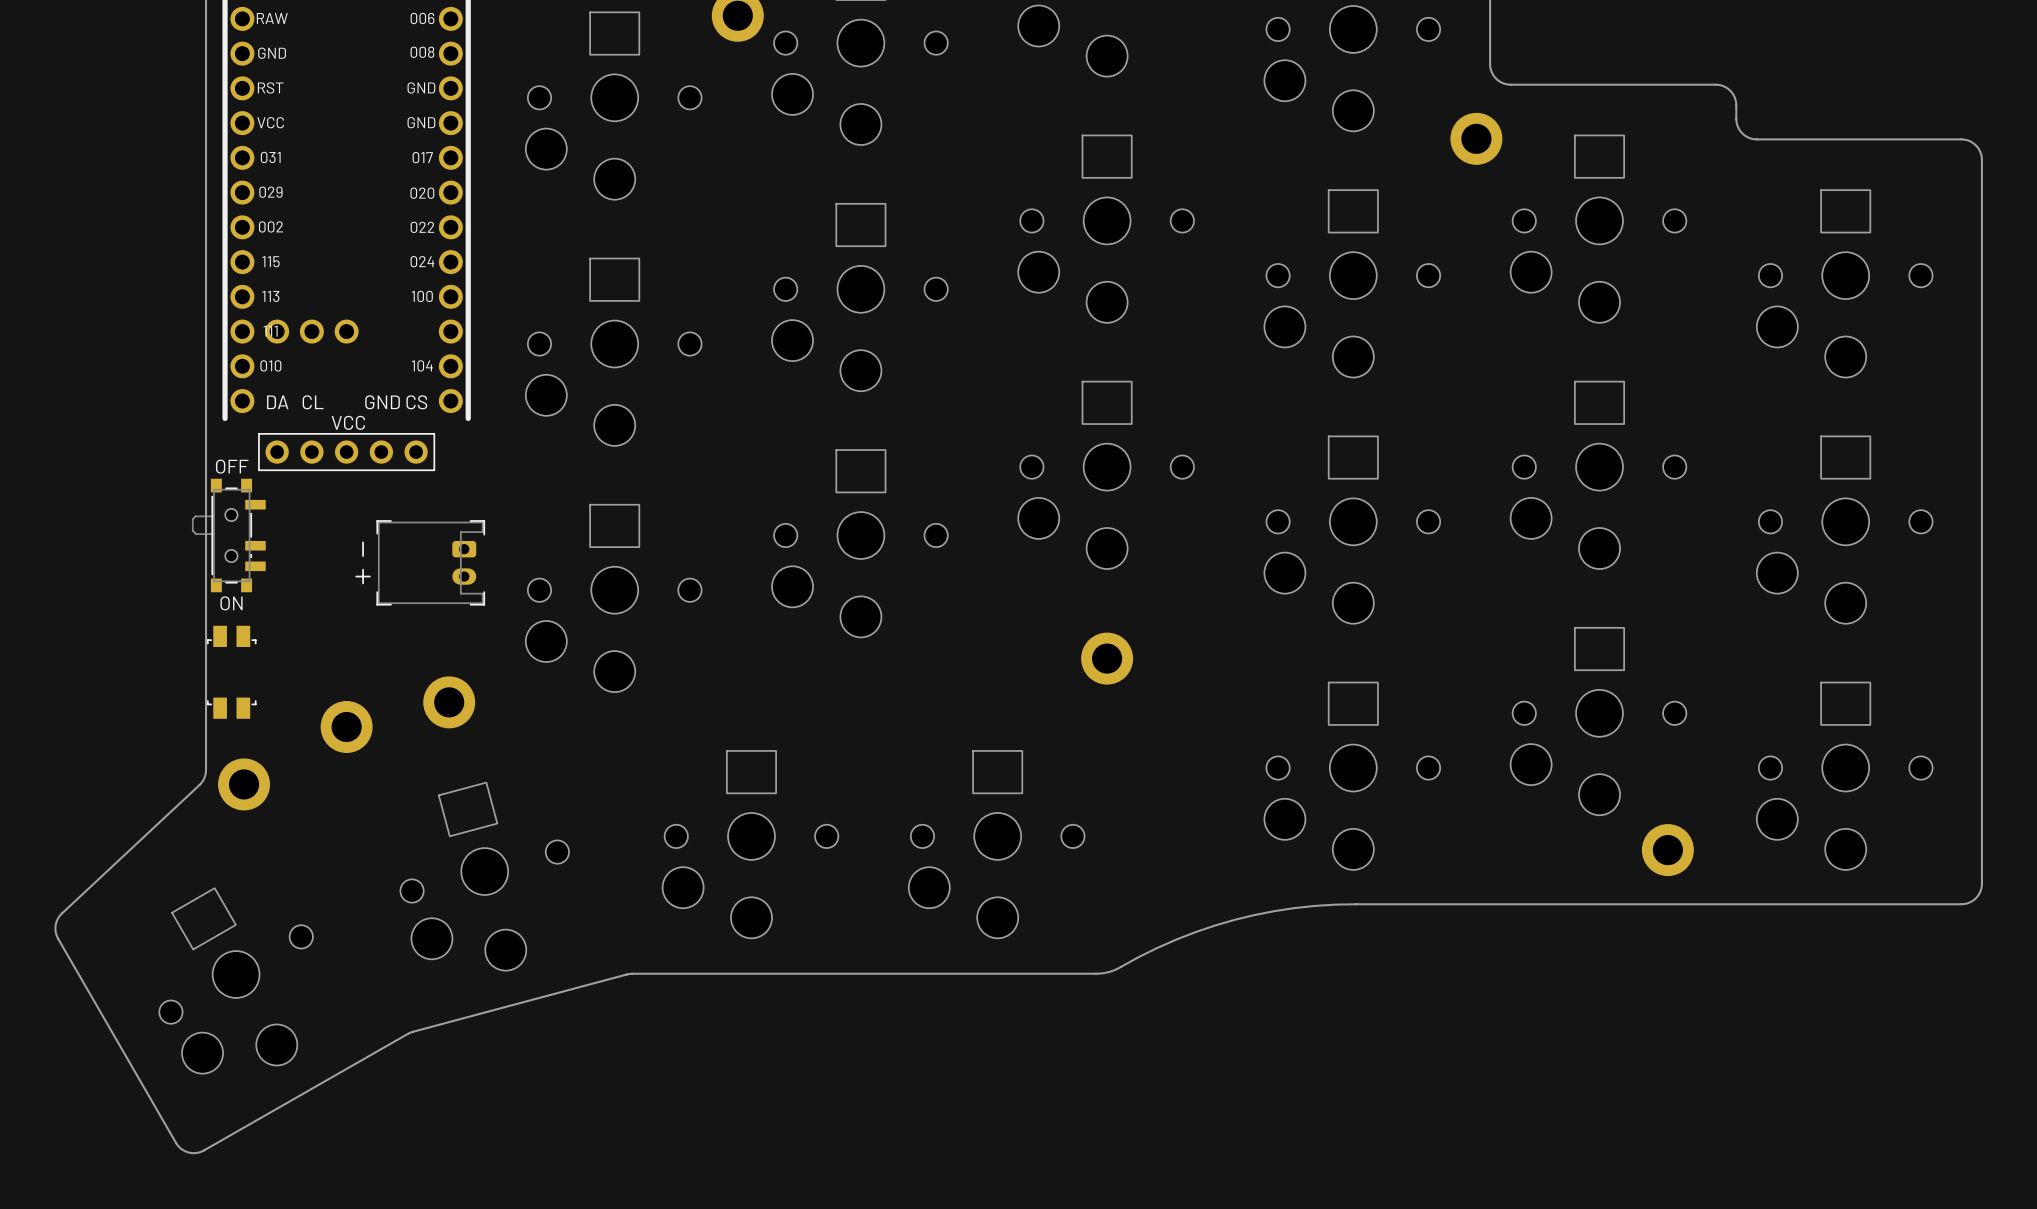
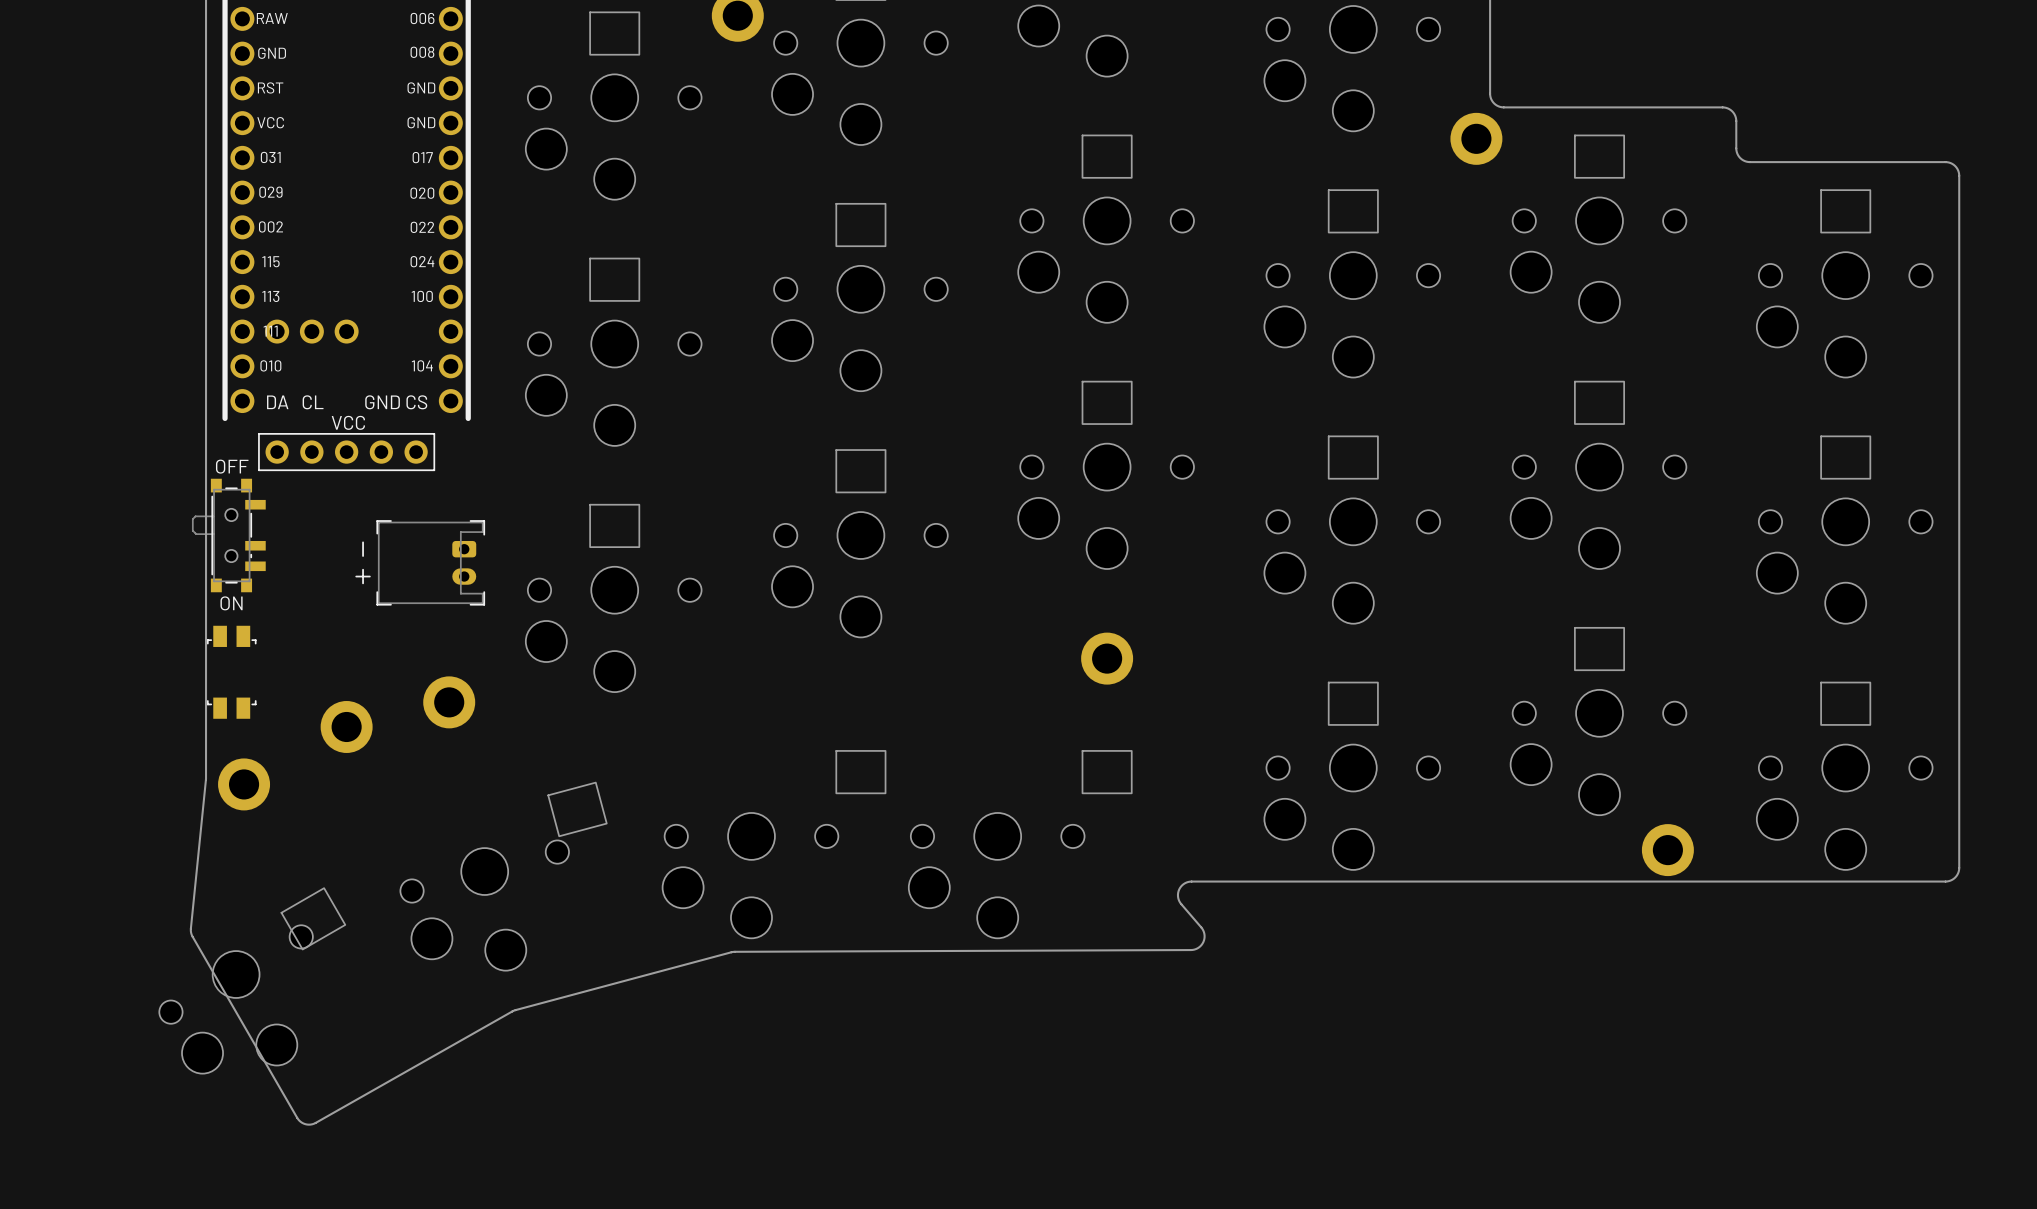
board edge: (1490, 64) (1494, 76) (1500, 81) (1507, 84) (1721, 85) (1728, 88) (1734, 97) (1736, 121) (1739, 129) (1744, 135) (1754, 139) (1961, 139) (1971, 142) (1979, 149) (1981, 159) (1981, 883) (1979, 893) (1971, 901) (1961, 904) (1335, 904) (1274, 911) (1214, 925) (1157, 947) (1113, 970) (1100, 973) (629, 973) (410, 1032) (203, 1150) (191, 1152) (181, 1148) (176, 1142) (58, 938) (55, 927) (56, 921) (61, 913) (200, 783) (206, 770) -> (1490, 64) (1490, 97) (1494, 103) (1500, 106) (1724, 107) (1730, 110) (1735, 115) (1736, 151) (1740, 158) (1746, 161) (1945, 162) (1952, 163) (1957, 168) (1959, 175) (1959, 867) (1957, 874) (1952, 879) (1945, 881) (1189, 881) (1181, 886) (1177, 896) (1180, 902) (1203, 931) (1203, 942) (1194, 949) (733, 951) (513, 1010) (315, 1122) (308, 1124) (302, 1122) (297, 1117) (191, 934) (206, 770)
part: (751, 772) -> none
part: none -> (860, 772)
part: (997, 772) -> none
part: none -> (1107, 772)
part position: (468, 809) -> (577, 809)
part position: (203, 918) -> (313, 918)

